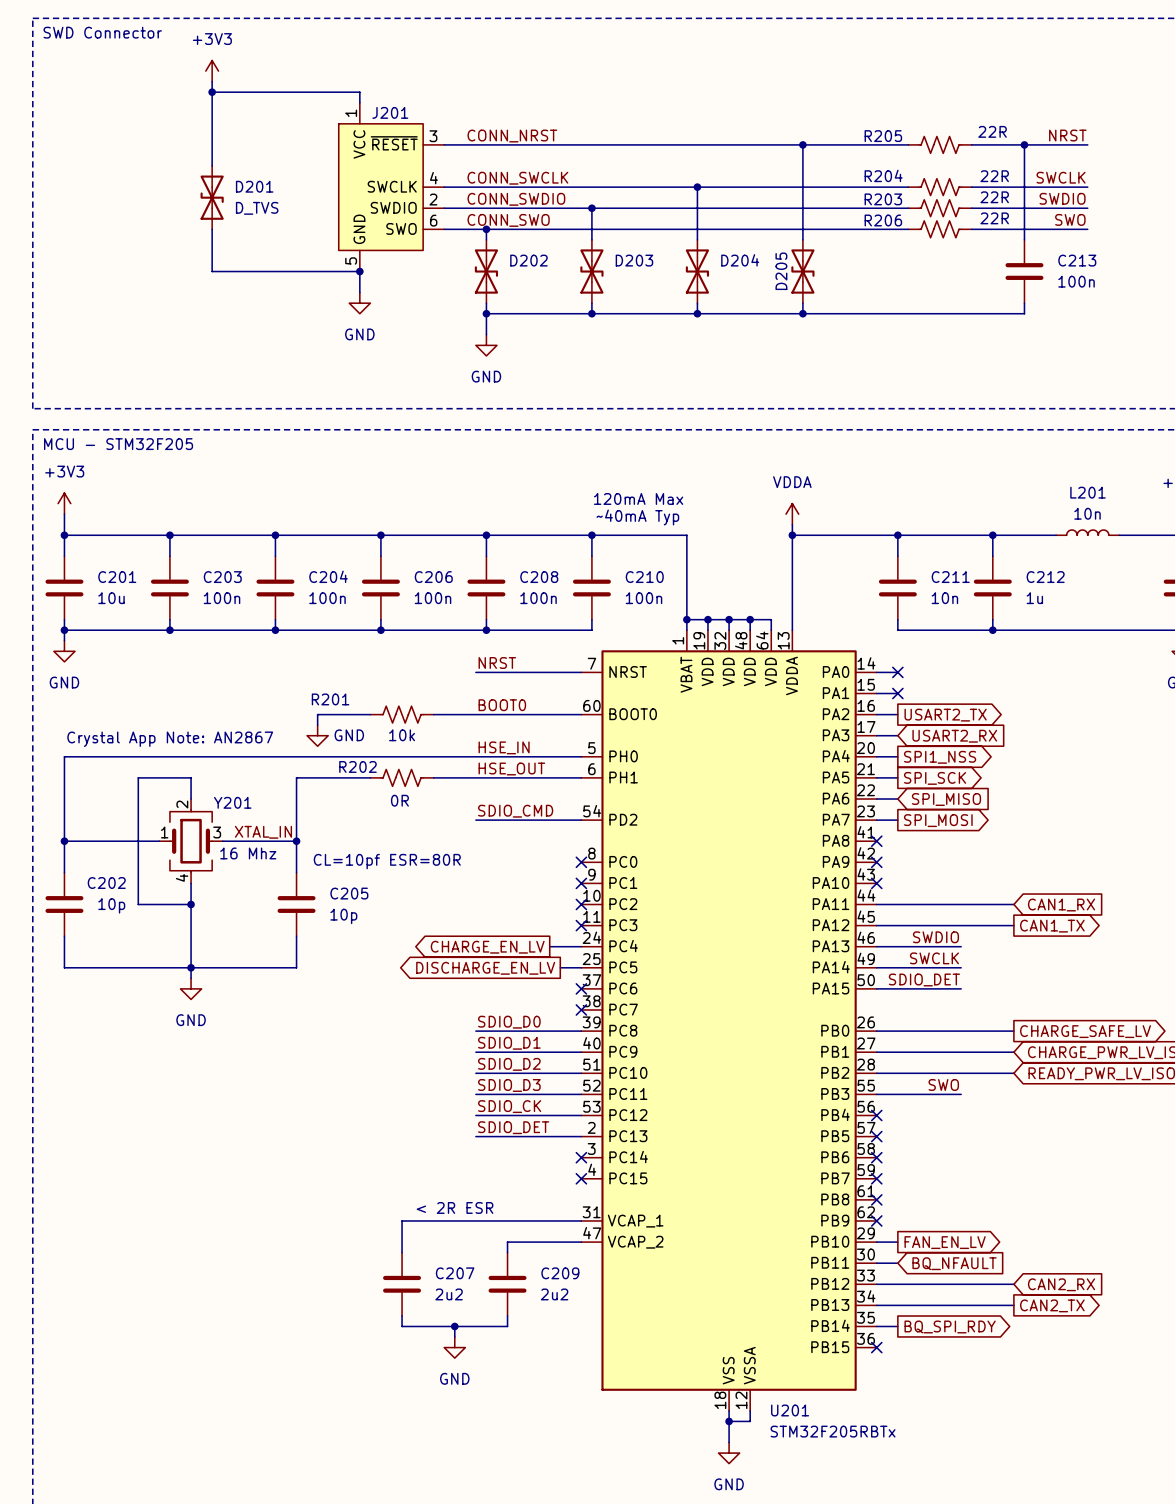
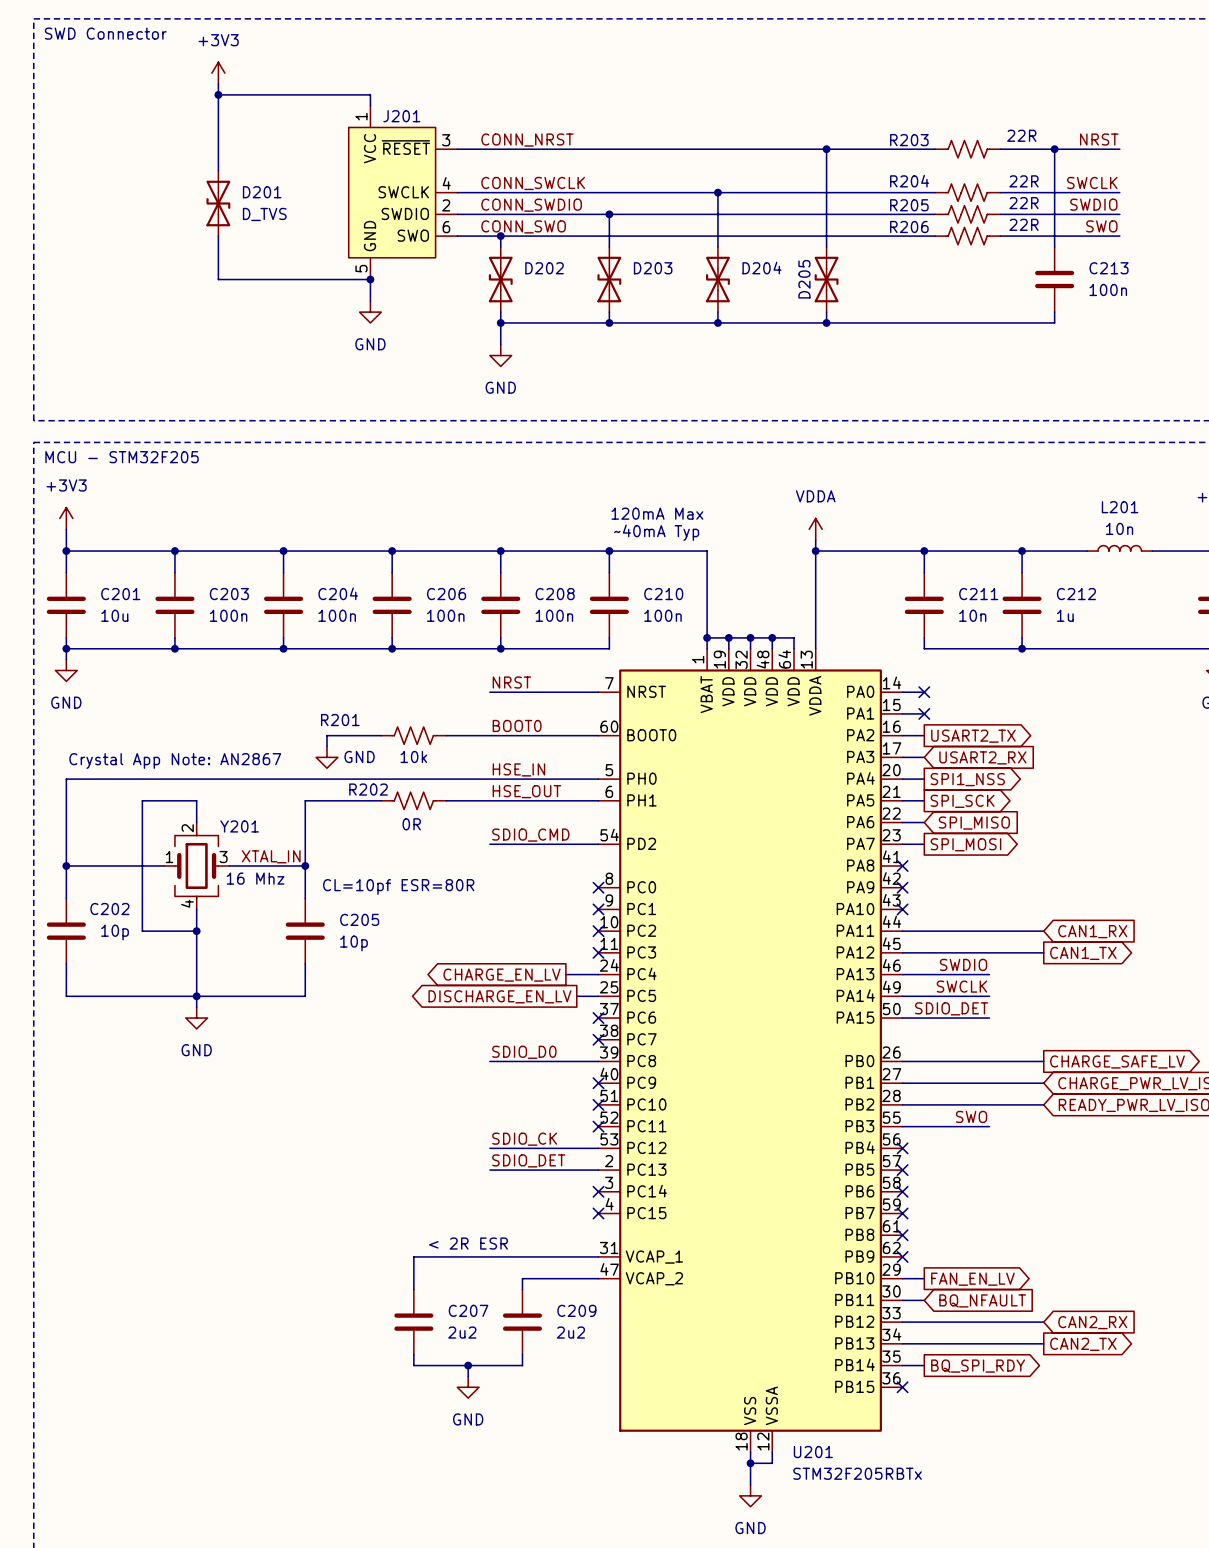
R205 name: R205 (883, 136) -> R203 (909, 140)
R203 name: R203 (883, 199) -> R205 (909, 205)
label: SDIO_D1 (509, 1043) -> none
wire: (475, 1052) (581, 1052) -> none
no-connect mark: none -> (598, 1083)
label: SDIO_D2 (509, 1064) -> none
wire: (475, 1073) (581, 1073) -> none
no-connect mark: none -> (598, 1104)
label: SDIO_D3 (509, 1085) -> none
wire: (475, 1094) (581, 1094) -> none
no-connect mark: none -> (598, 1126)

